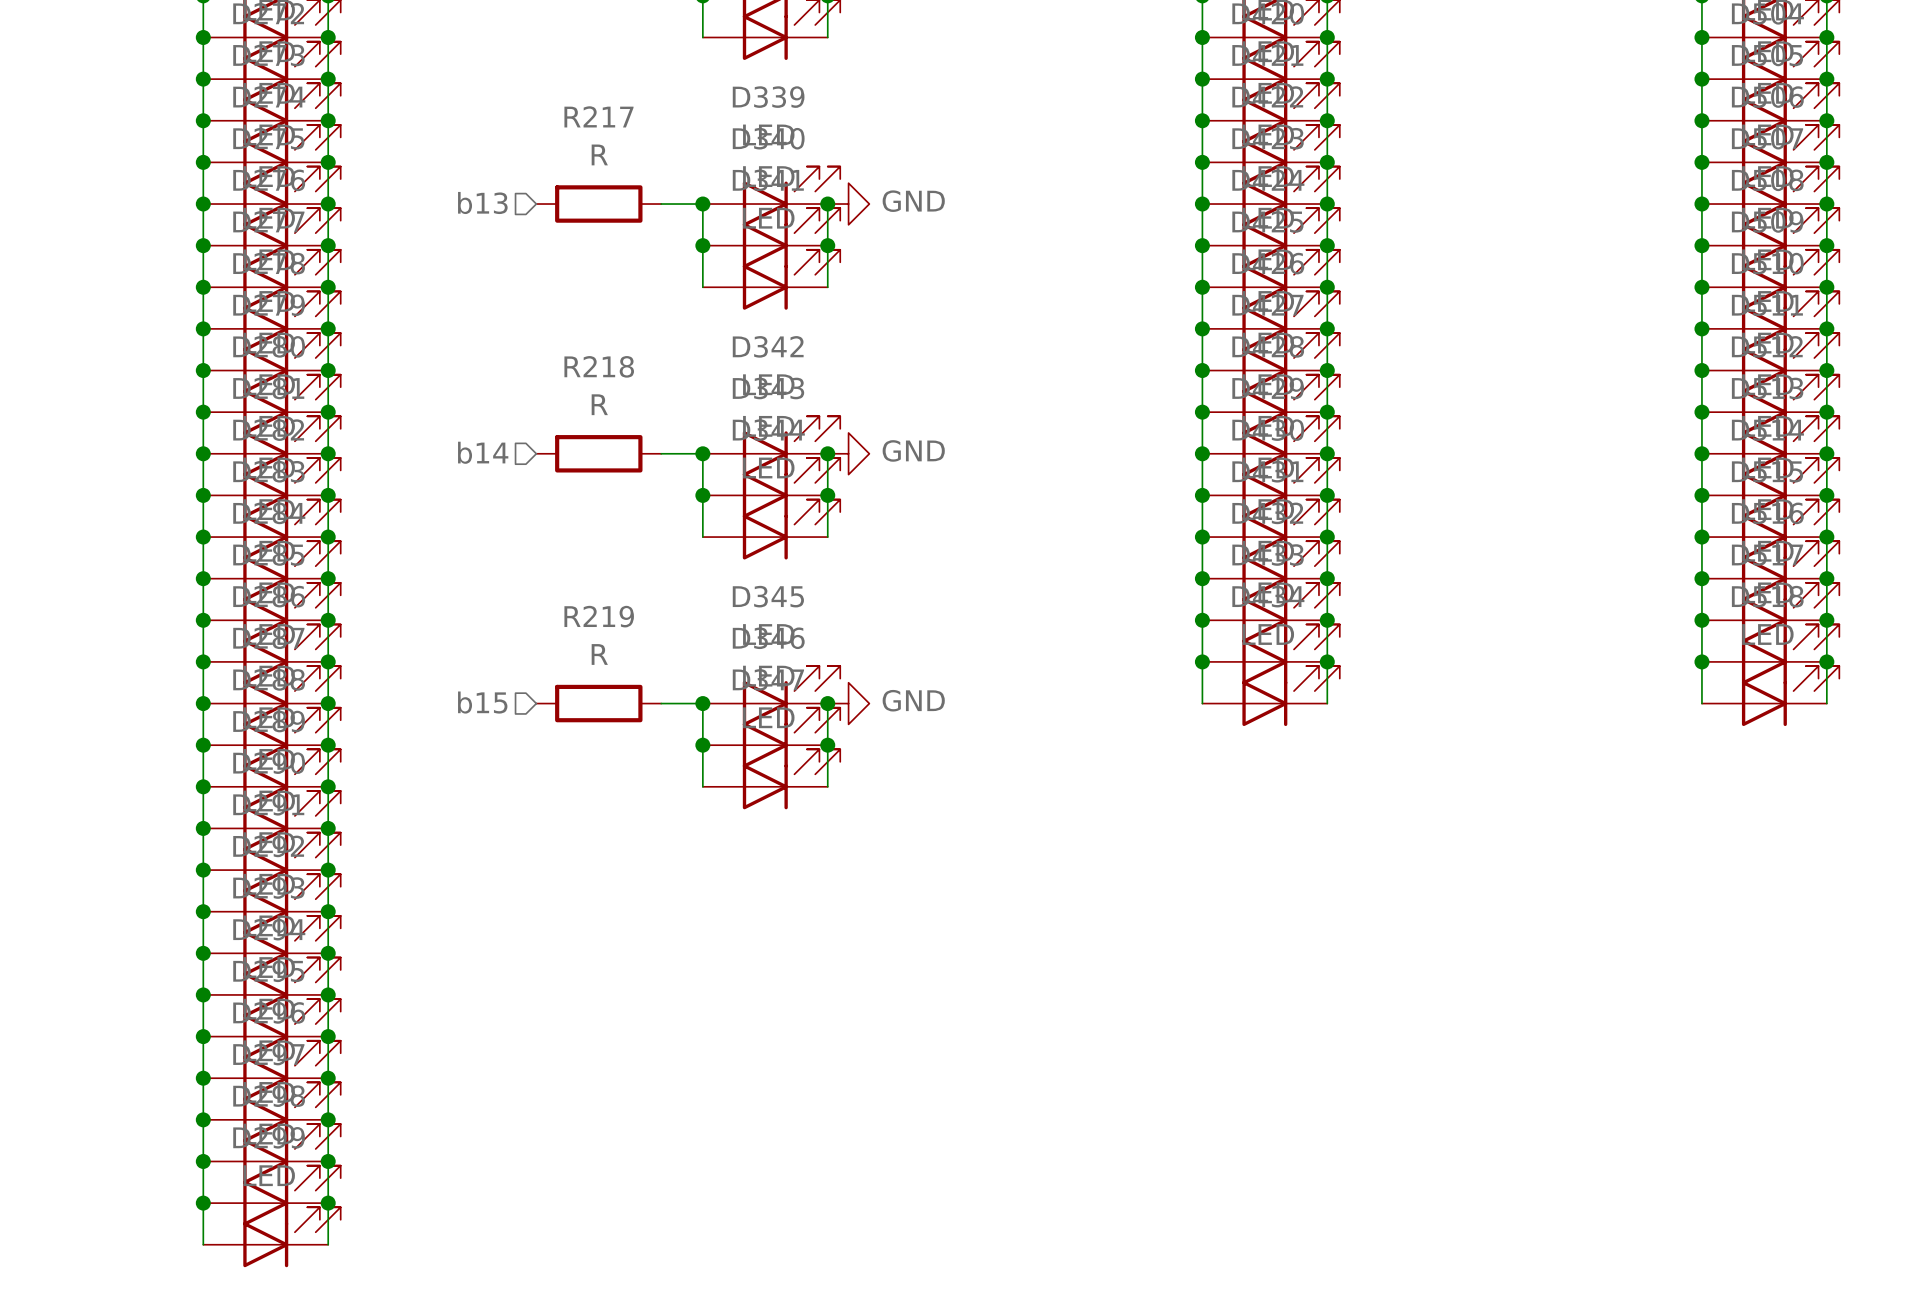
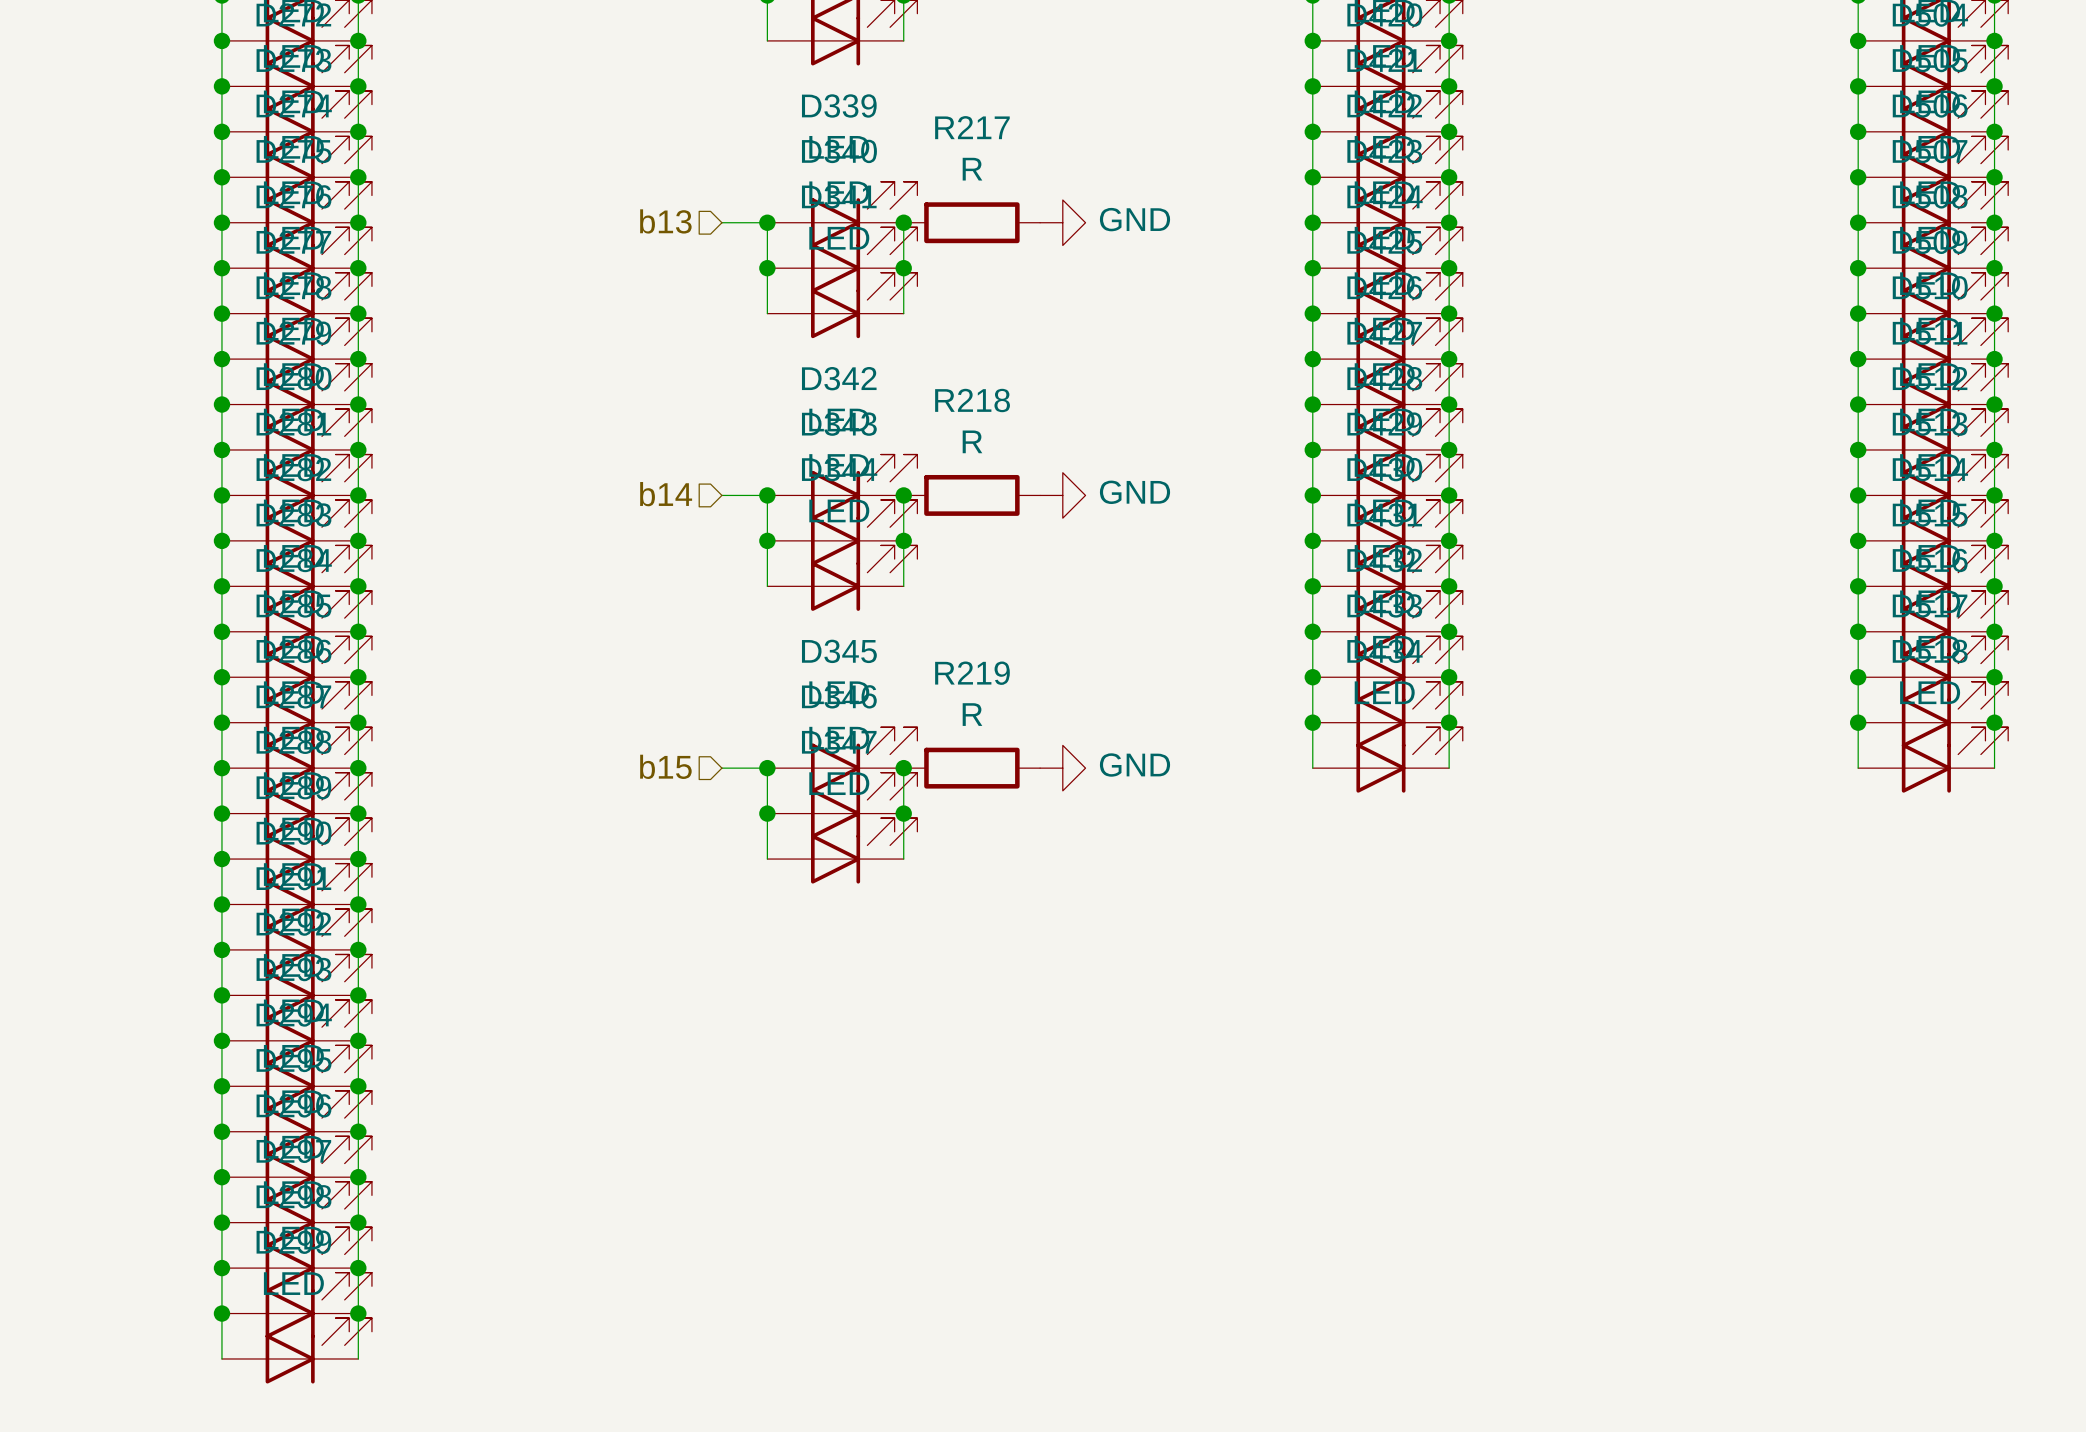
hierarchical label position: b13 (482, 202) -> b13 (665, 221)
R217 position: (598, 204) -> (971, 222)
power symbol position: GND (848, 204) -> GND (1062, 222)
hierarchical label position: b14 (483, 452) -> b14 (666, 494)
R218 position: (598, 453) -> (971, 495)
power symbol position: GND (848, 453) -> GND (1062, 495)
hierarchical label position: b15 (482, 702) -> b15 (665, 766)
R219 position: (598, 703) -> (971, 768)
power symbol position: GND (848, 703) -> GND (1062, 768)

